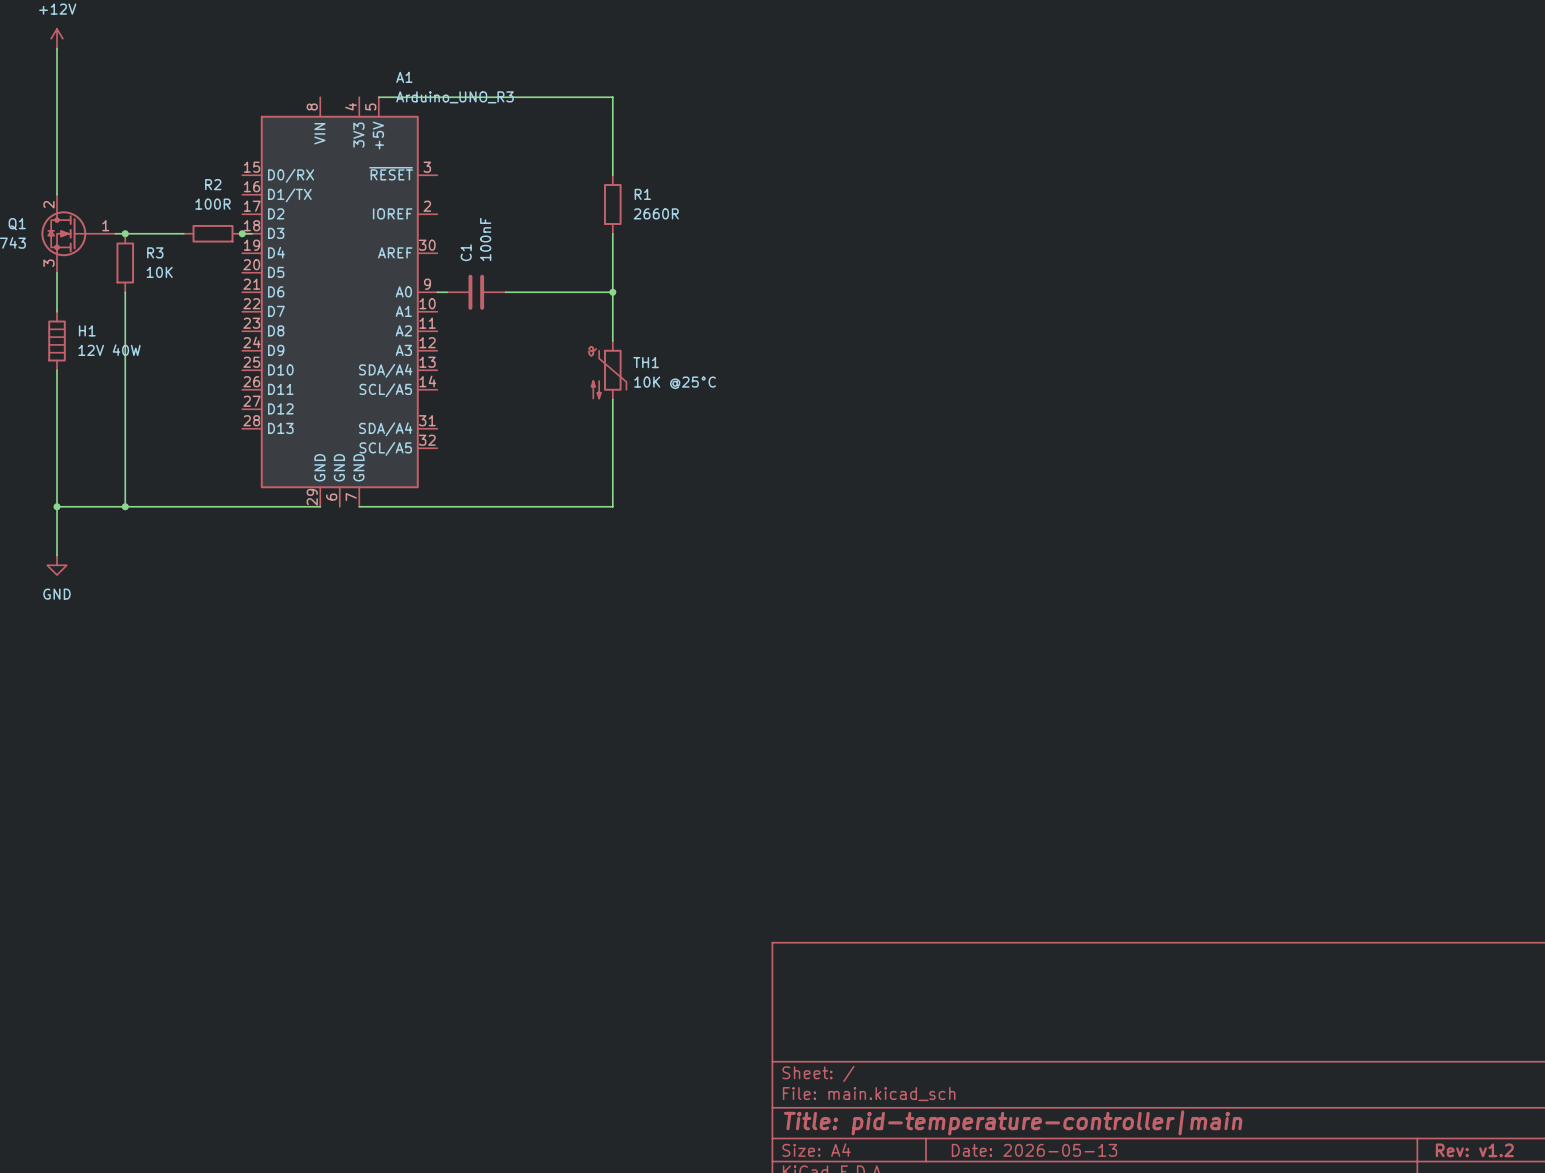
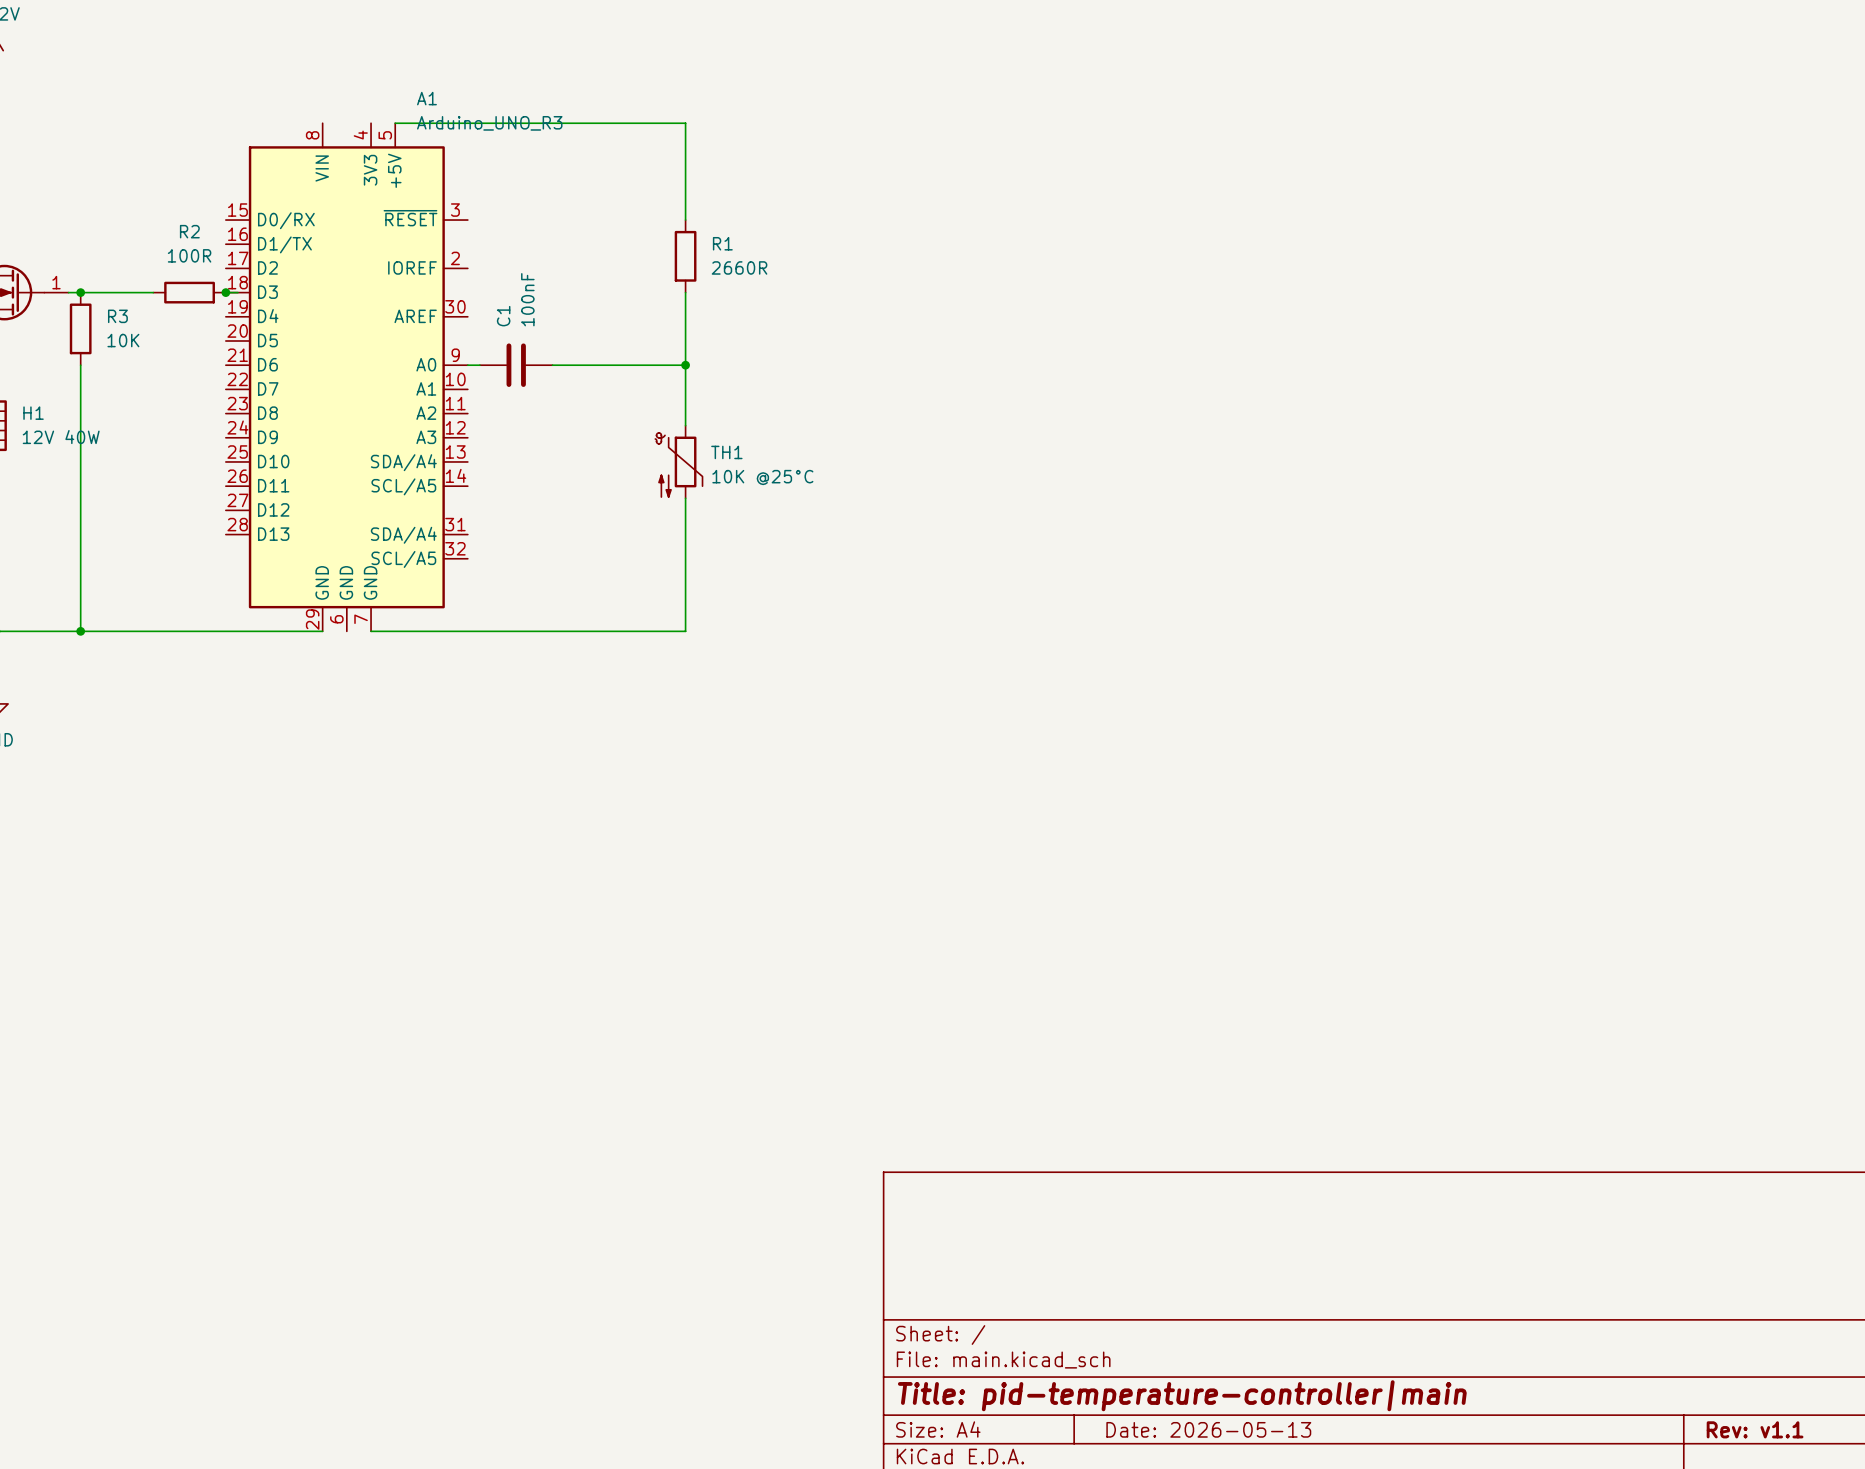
title block: Rev: v1.2 (1474, 1150) -> Rev: v1.1 (1755, 1429)

